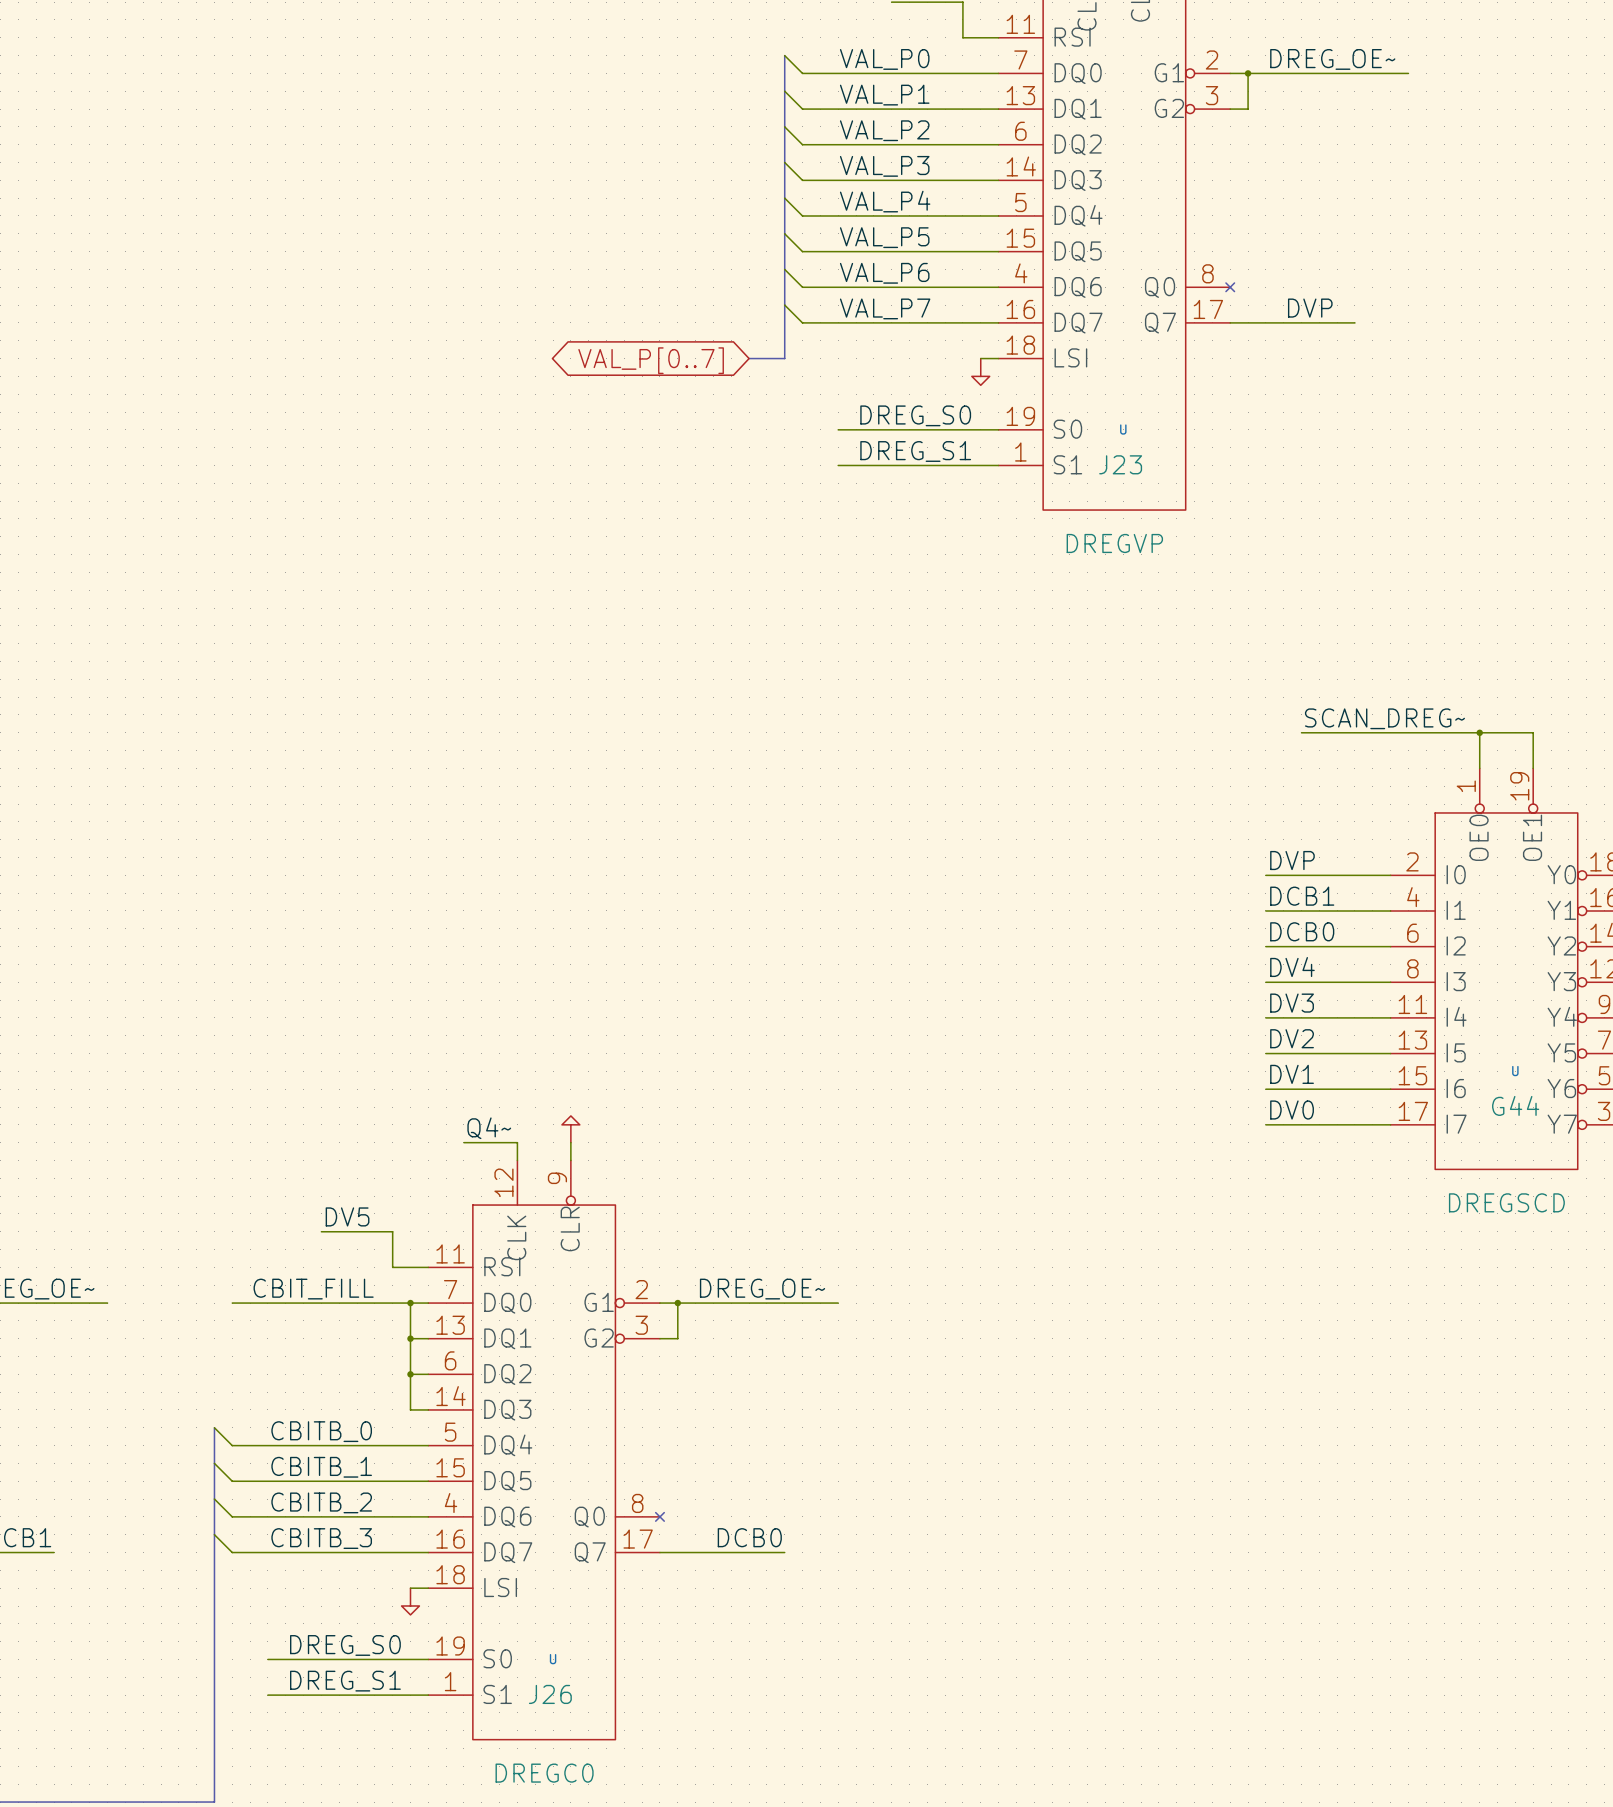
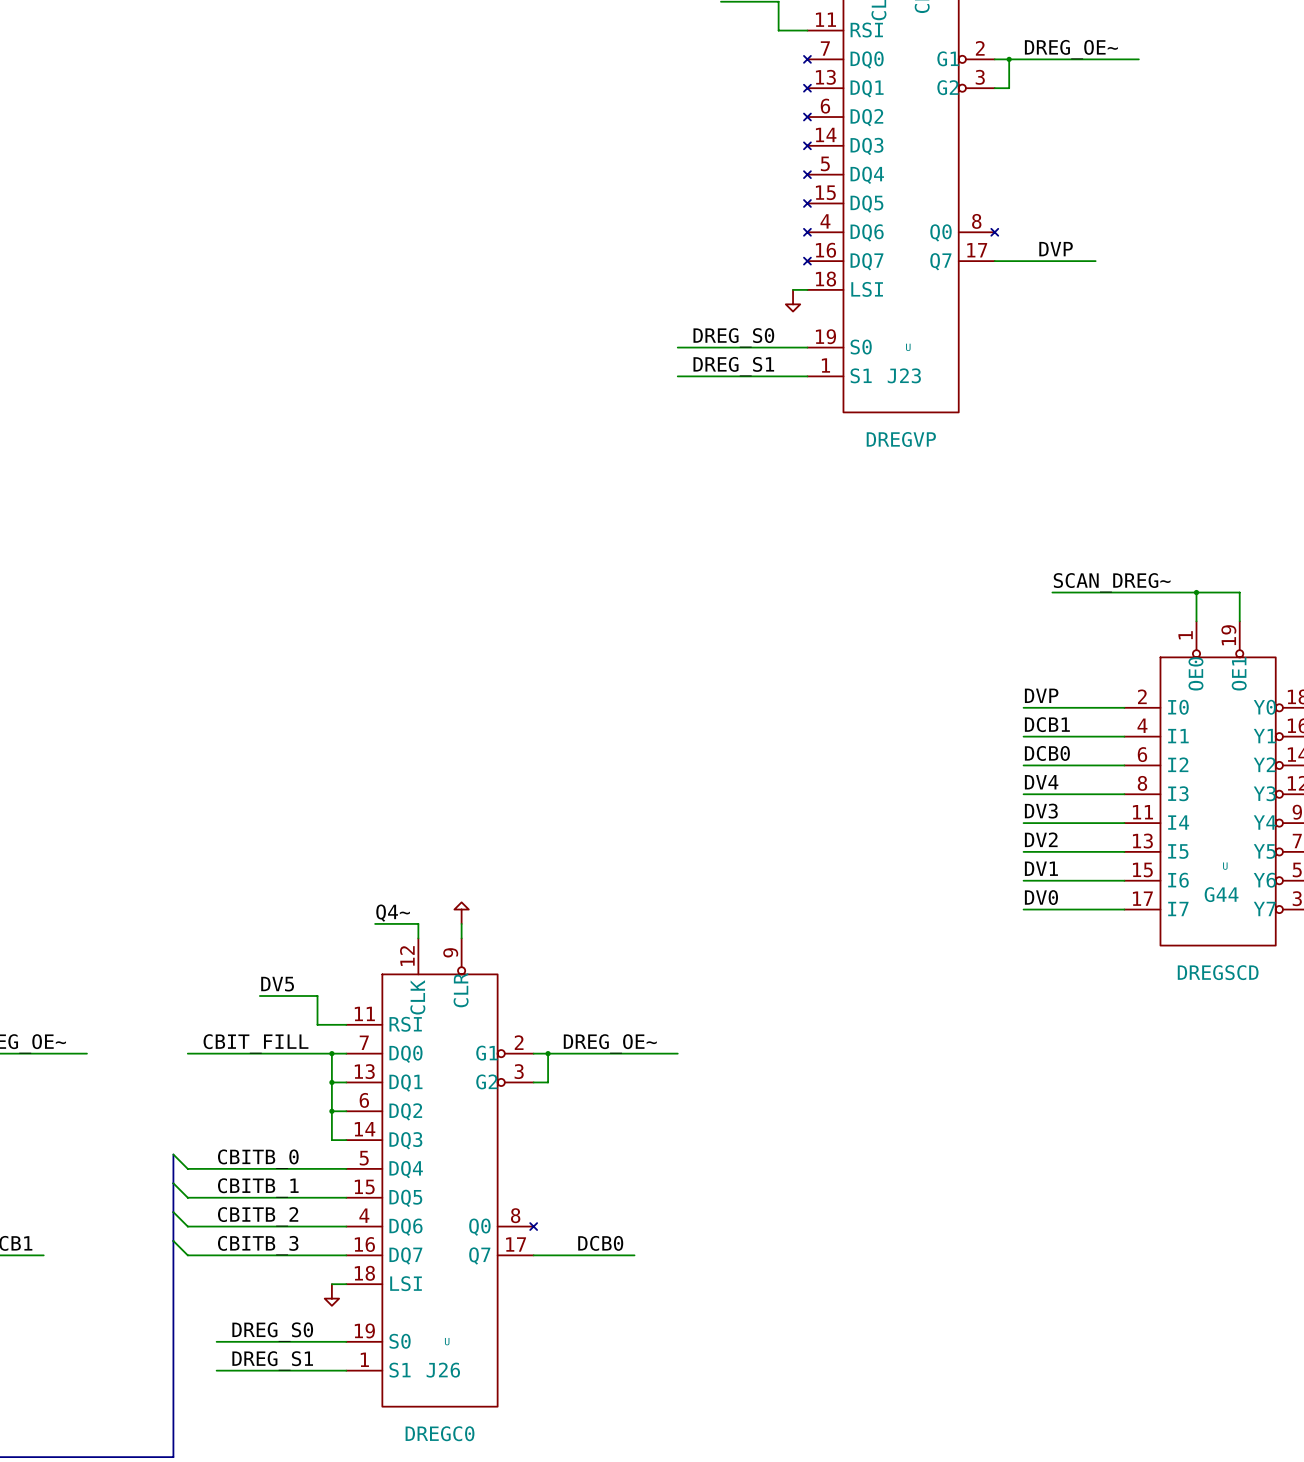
wire: (784, 55) (802, 73) (998, 73) -> none
bus: (784, 55) (784, 358) (749, 358) -> none
label: VAL_P0 (884, 59) -> none
no-connect mark: none -> (807, 59)
wire: (784, 91) (802, 109) (998, 109) -> none
label: VAL_P1 (884, 95) -> none
no-connect mark: none -> (807, 88)
wire: (784, 126) (802, 144) (998, 144) -> none
label: VAL_P2 (884, 130) -> none
no-connect mark: none -> (807, 117)
wire: (784, 162) (802, 180) (998, 180) -> none
label: VAL_P3 (884, 166) -> none
no-connect mark: none -> (807, 145)
wire: (784, 198) (802, 215) (998, 215) -> none
label: VAL_P4 (885, 201) -> none
no-connect mark: none -> (807, 174)
wire: (784, 233) (802, 251) (998, 251) -> none
label: VAL_P5 (884, 237) -> none
no-connect mark: none -> (807, 203)
wire: (784, 269) (802, 287) (998, 287) -> none
label: VAL_P6 (884, 273) -> none
no-connect mark: none -> (807, 232)
wire: (784, 305) (802, 322) (998, 322) -> none
label: VAL_P7 (885, 308) -> none
no-connect mark: none -> (807, 261)
global label: VAL_P[0..7] (651, 360) -> none

